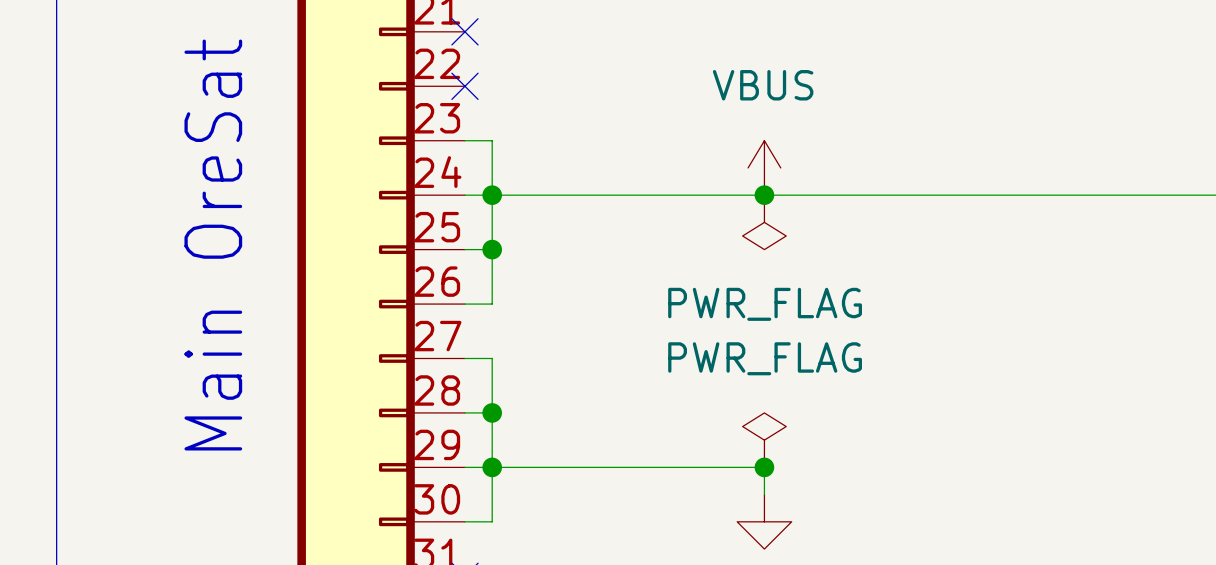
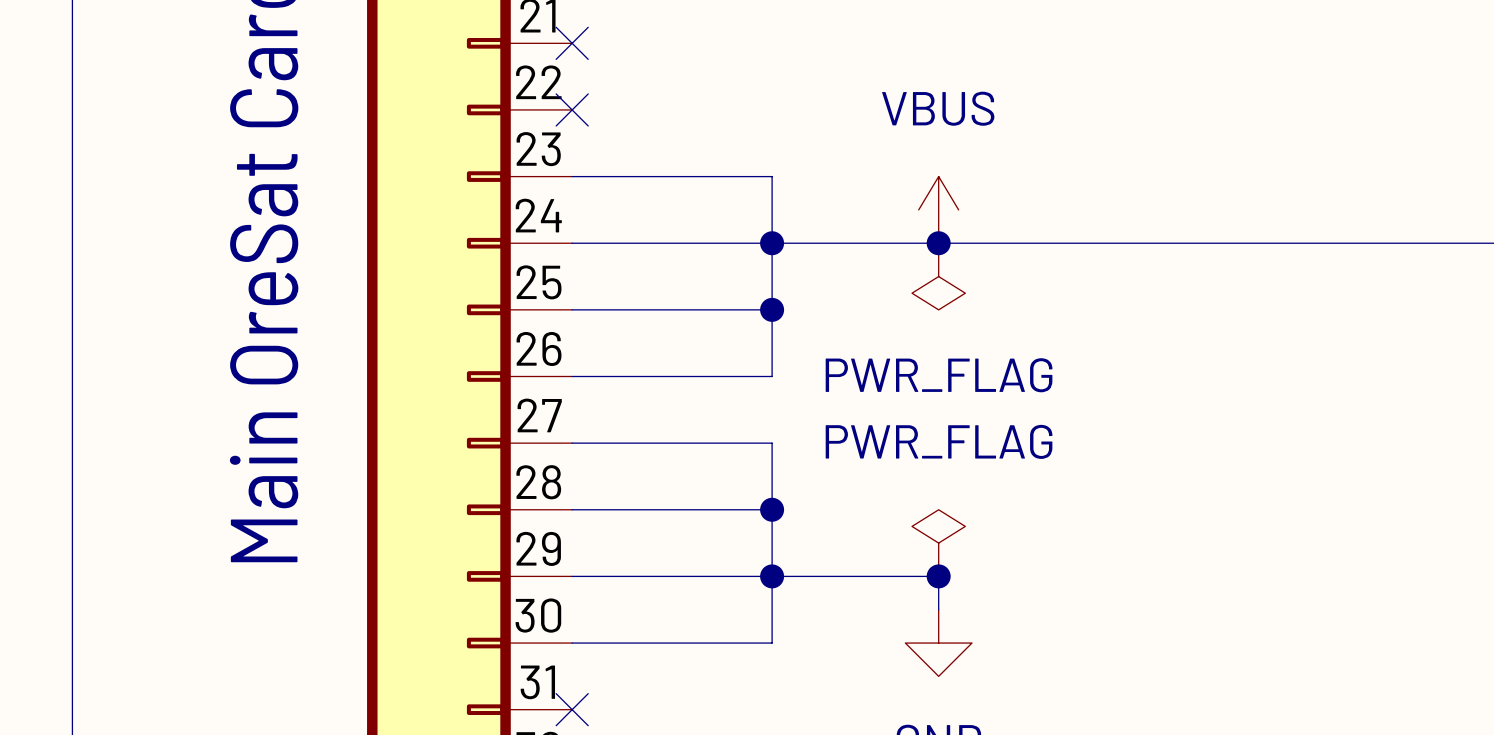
wire: (492, 140) (492, 304) -> (605, 176) (772, 176) (772, 376) (605, 376)
junction: (492, 195) -> none
junction: none -> (772, 243)
wire: none -> (605, 309) (772, 309)
junction: (492, 249) -> none
junction: none -> (772, 309)
wire: (492, 358) (492, 521) -> (605, 443) (772, 443) (772, 643) (605, 643)
wire: none -> (605, 509) (772, 509)
junction: (492, 412) -> none
junction: none -> (772, 509)
junction: (492, 467) -> none
junction: none -> (772, 576)

